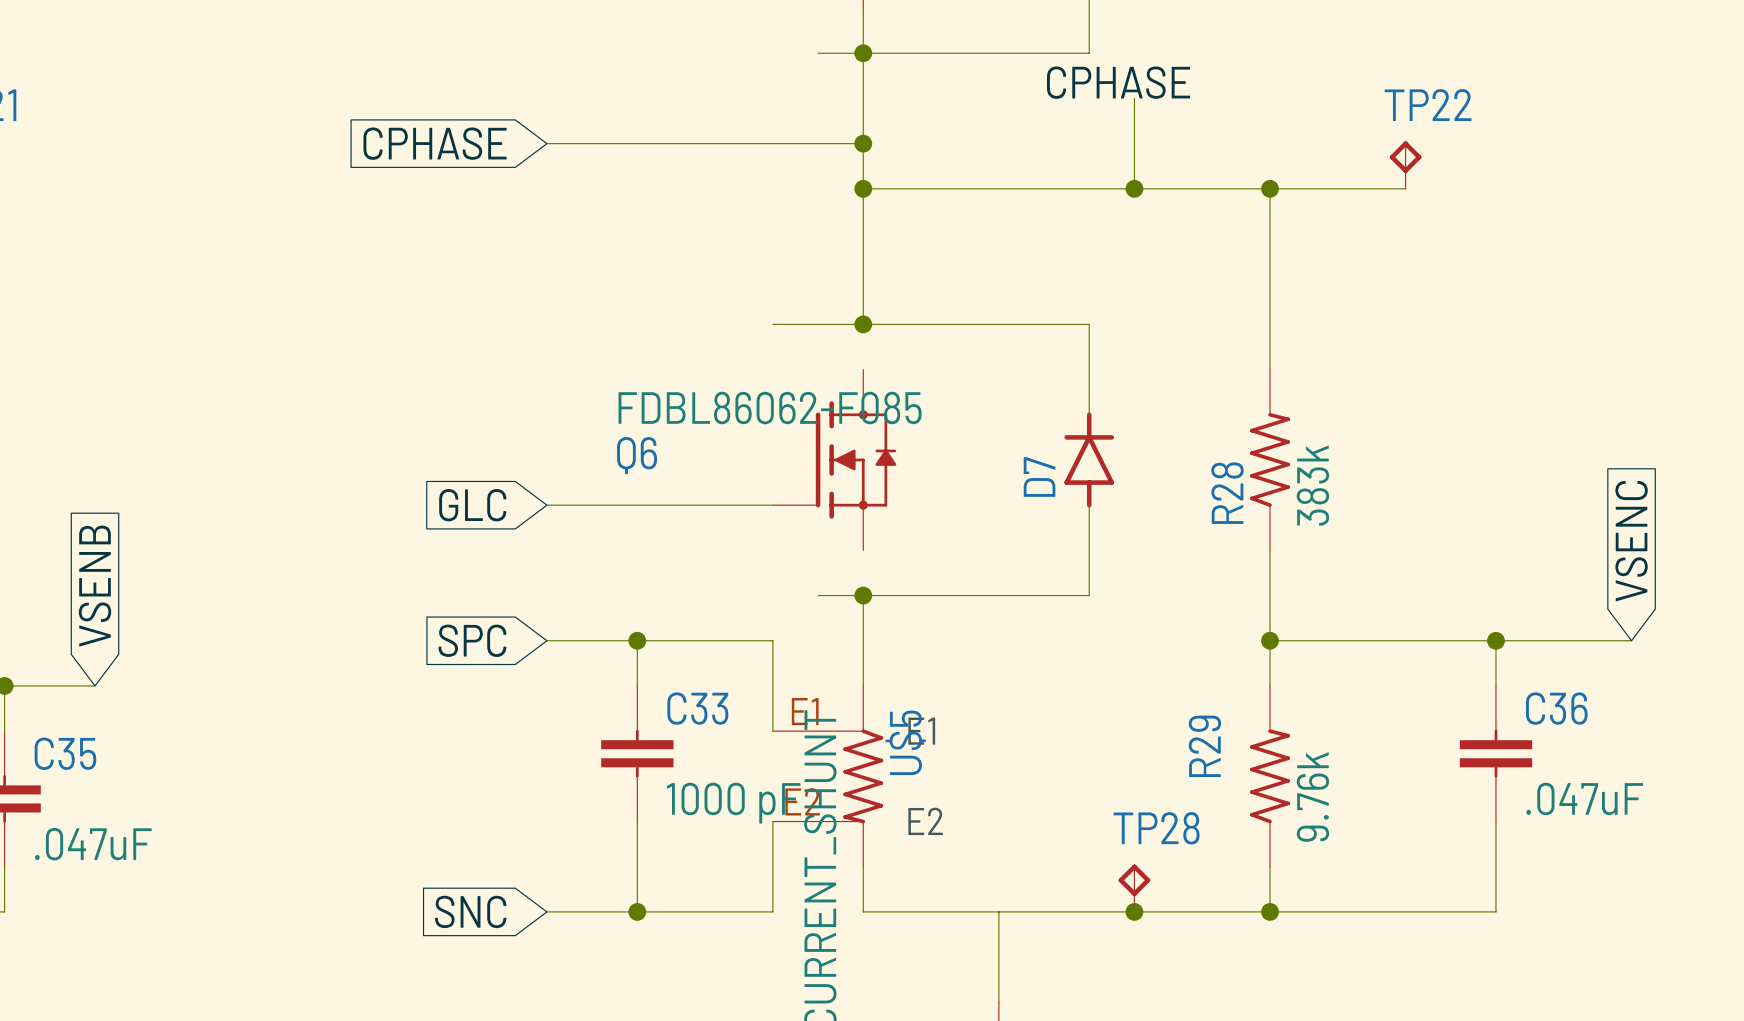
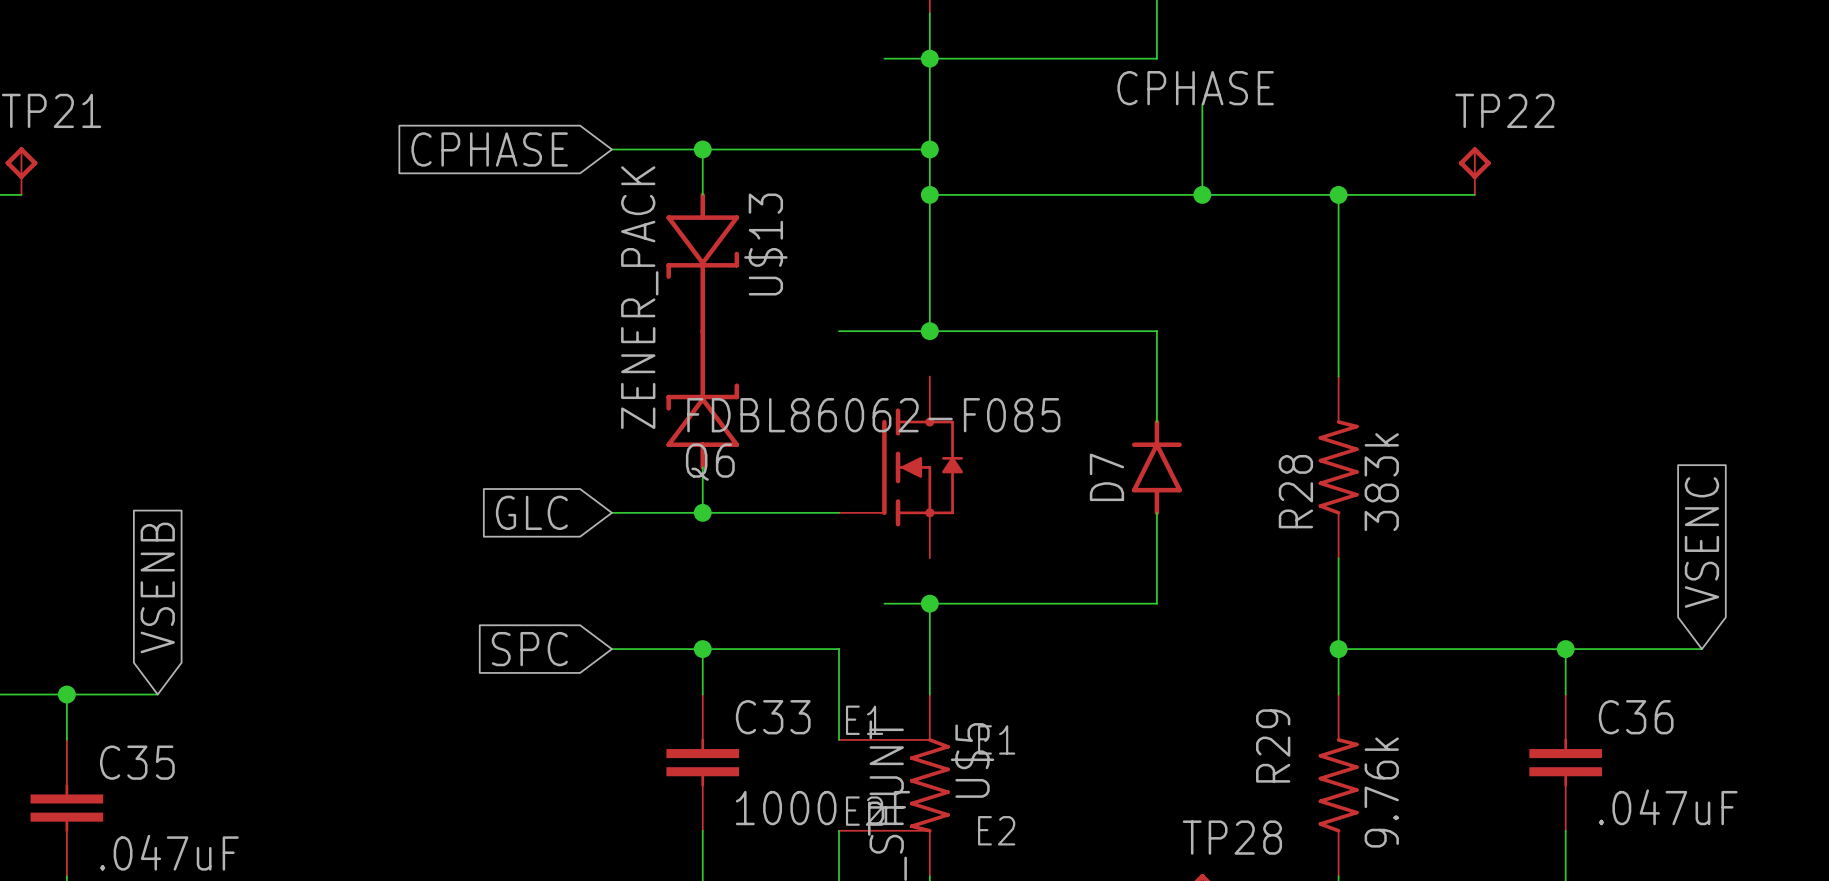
wire: none -> (702, 149) (702, 194)
junction: none -> (702, 149)
U$13: none -> ZENER_PACK (702, 331)
wire: none -> (702, 467) (702, 512)
junction: none -> (702, 512)

